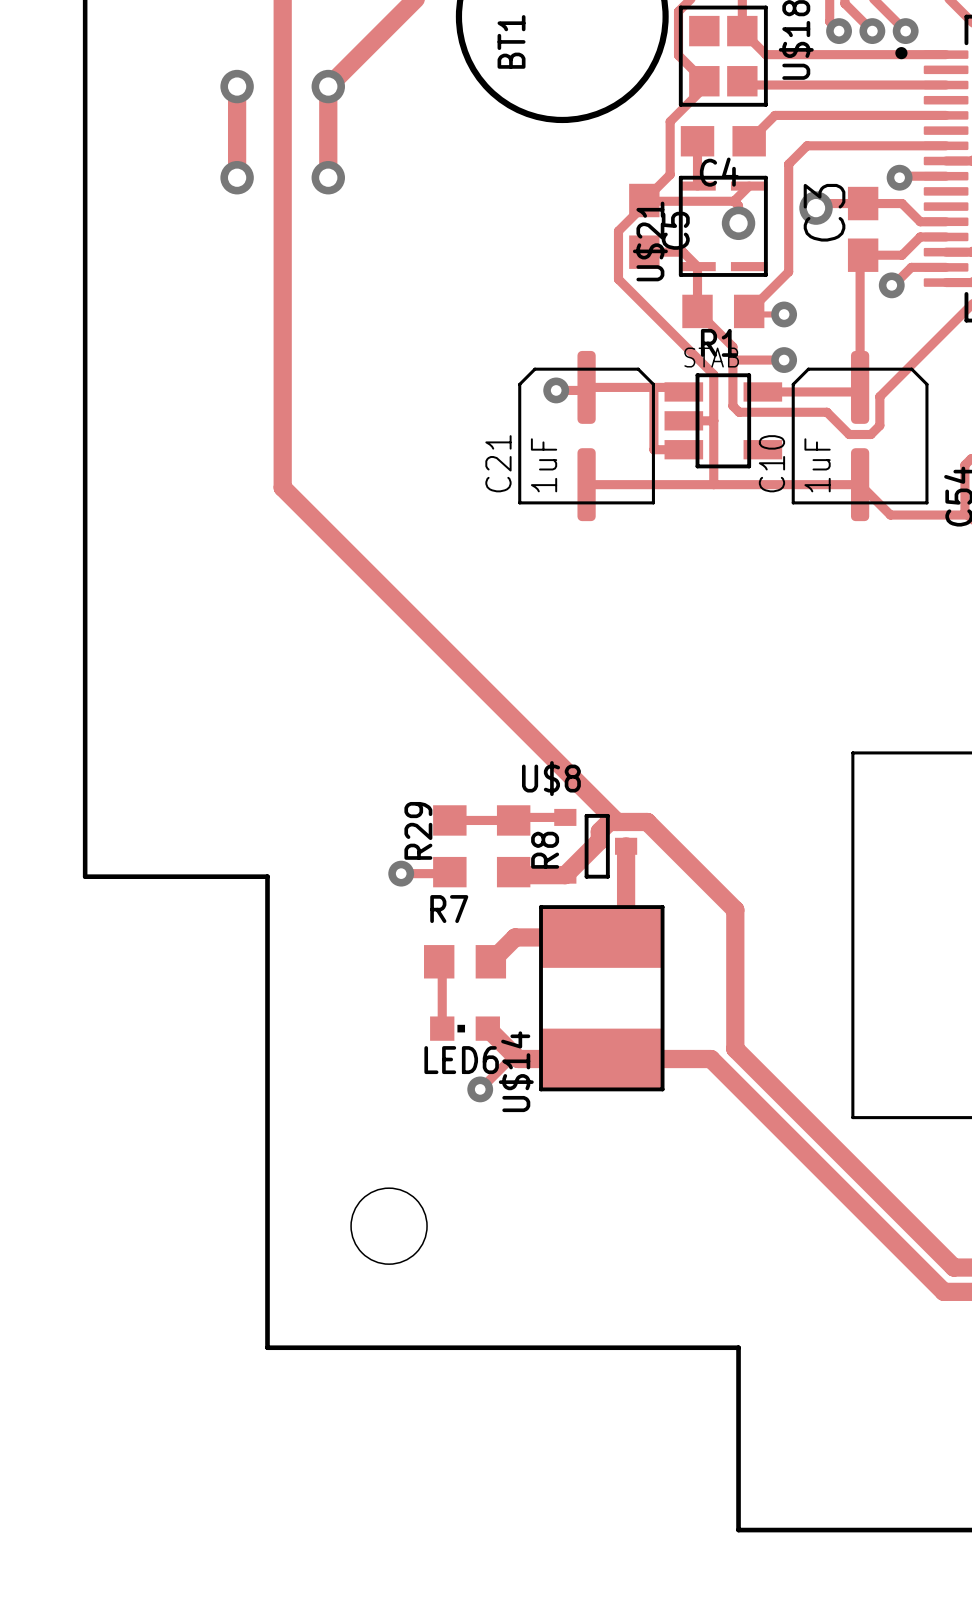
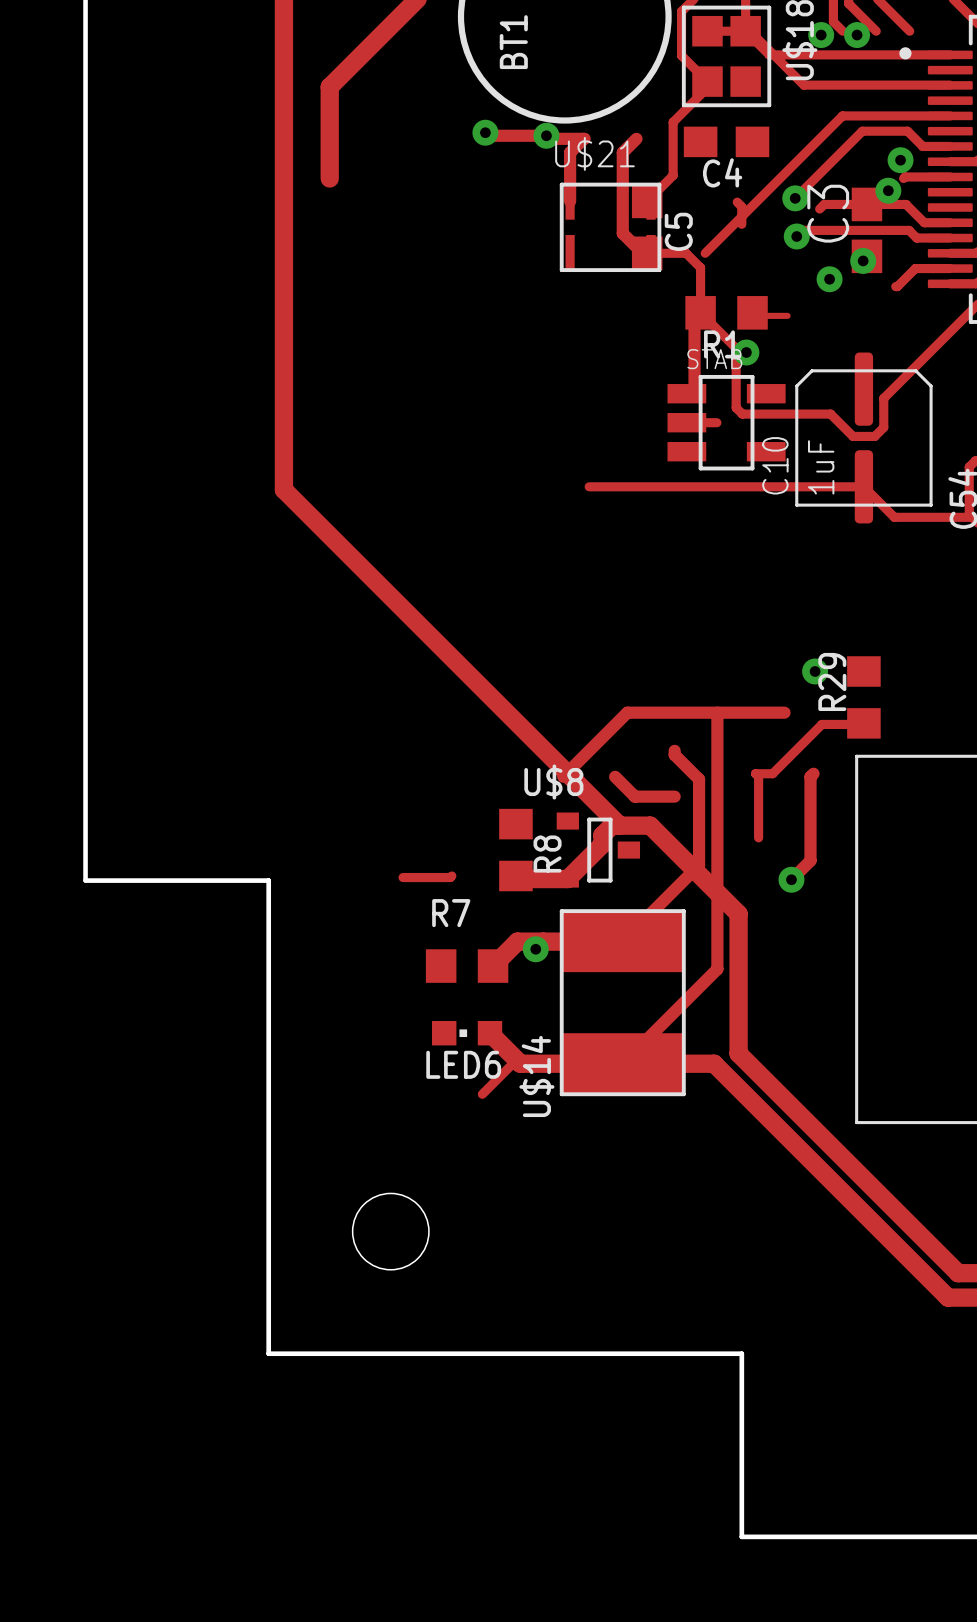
via: (839, 31) -> none
via: (872, 31) -> none
via: (905, 31) -> none
via: none -> (821, 35)
via: none -> (857, 35)
track: (742, 81) (746, 85) (946, 85) -> (721, 31) (750, 31) (803, 85) (950, 85)
track: (237, 86) (237, 177) -> none
via: (237, 86) -> none
via: (328, 86) -> none
track: (838, 115) (775, 115) (749, 141) -> (842, 115) (705, 253)
track: none -> (485, 132) (488, 135) (546, 135) (549, 138) (584, 138) (581, 140)
via: none -> (485, 132)
via: none -> (546, 135)
track: none -> (583, 138) (570, 152) (570, 201)
track: none -> (636, 138) (622, 152) (622, 233) (642, 253) (647, 253)
track: (697, 141) (697, 186) -> none
track: (918, 145) (807, 145) (788, 164) (788, 271) (749, 311) -> (922, 146) (907, 131) (862, 131) (795, 198)
via: none -> (900, 160)
via: (237, 177) -> none
via: (328, 177) -> none
via: (899, 177) -> none
track: (749, 186) (733, 201) (644, 200) (644, 205) (618, 231) (618, 279) (713, 374) (713, 484) -> none
via: none -> (888, 190)
via: none -> (795, 198)
via: (816, 208) -> none
via: (738, 223) -> none
U$21 rotation: 0° (723, 226) -> 90° clockwise (610, 227)
U$21 position: (723, 226) -> (610, 227)
via: none -> (796, 236)
track: (920, 236) (902, 255) (863, 255) (860, 258) (860, 387) (855, 391) (762, 391) -> (924, 238) (916, 238) (909, 230) (802, 230) (796, 236)
via: none -> (863, 260)
via: none -> (829, 279)
via: (891, 285) -> none
track: none -> (694, 315) (694, 389)
via: (784, 314) -> none
via: none -> (746, 352)
track: (732, 360) (784, 360) -> none
via: (784, 360) -> none
track: (653, 387) (653, 449) (683, 449) -> none
track: (556, 390) (583, 390) (586, 387) (679, 387) (679, 391) (683, 391) -> none
via: (556, 390) -> none
C21: 1uF (586, 436) -> none
via: none -> (815, 671)
track: none -> (717, 712) (717, 969) (622, 1063)
track: none -> (784, 712) (627, 712) (563, 776)
track: none -> (863, 723) (821, 724) (772, 773) (755, 773) (758, 776) (758, 837)
track: none -> (813, 773) (810, 776) (810, 860) (791, 879)
track: none -> (615, 776) (634, 796) (674, 796)
track: (565, 817) (516, 817) (513, 820) (449, 820) -> none
R29 position: (449, 846) -> (863, 697)
track: (626, 846) (626, 931) (632, 937) (620, 937) -> (674, 750) (674, 754) (699, 779) (699, 865) (622, 941)
via: (401, 873) -> none
via: none -> (791, 879)
via: none -> (535, 949)
track: (439, 961) (442, 964) (442, 1028) -> none
U$14 position: (601, 998) -> (622, 1002)
via: (480, 1089) -> none

